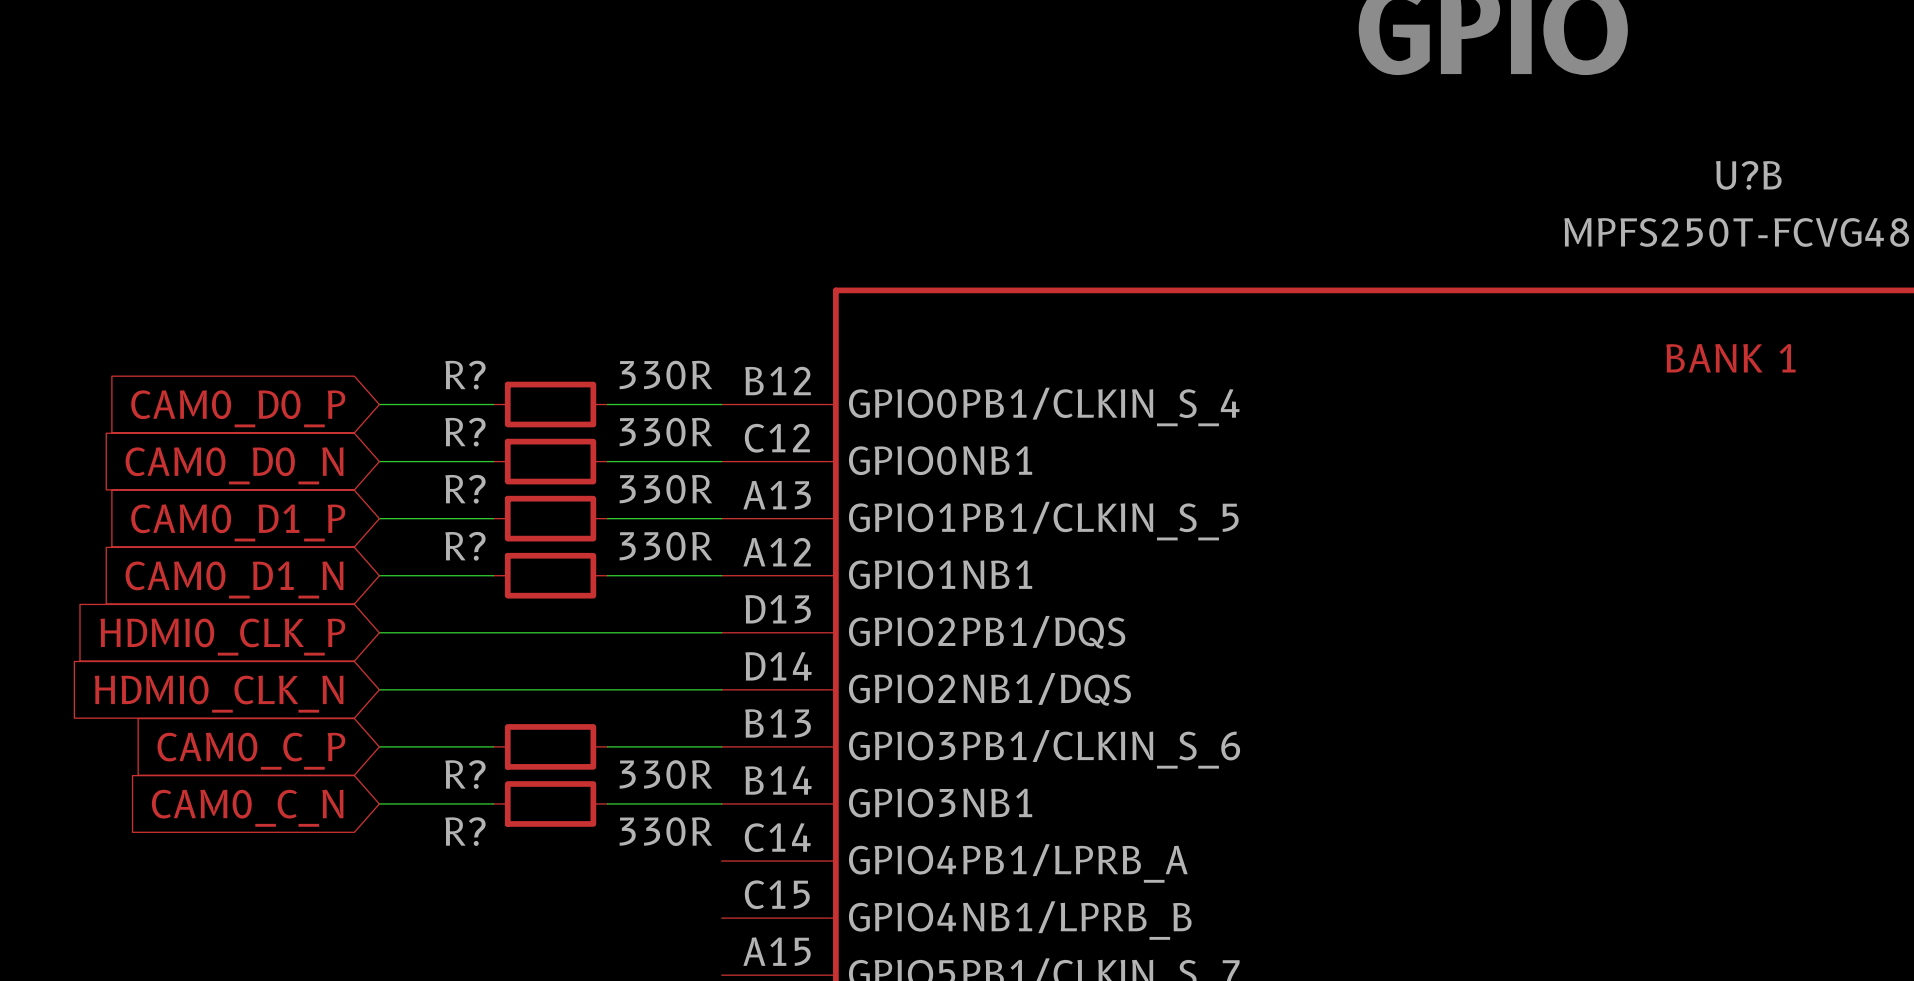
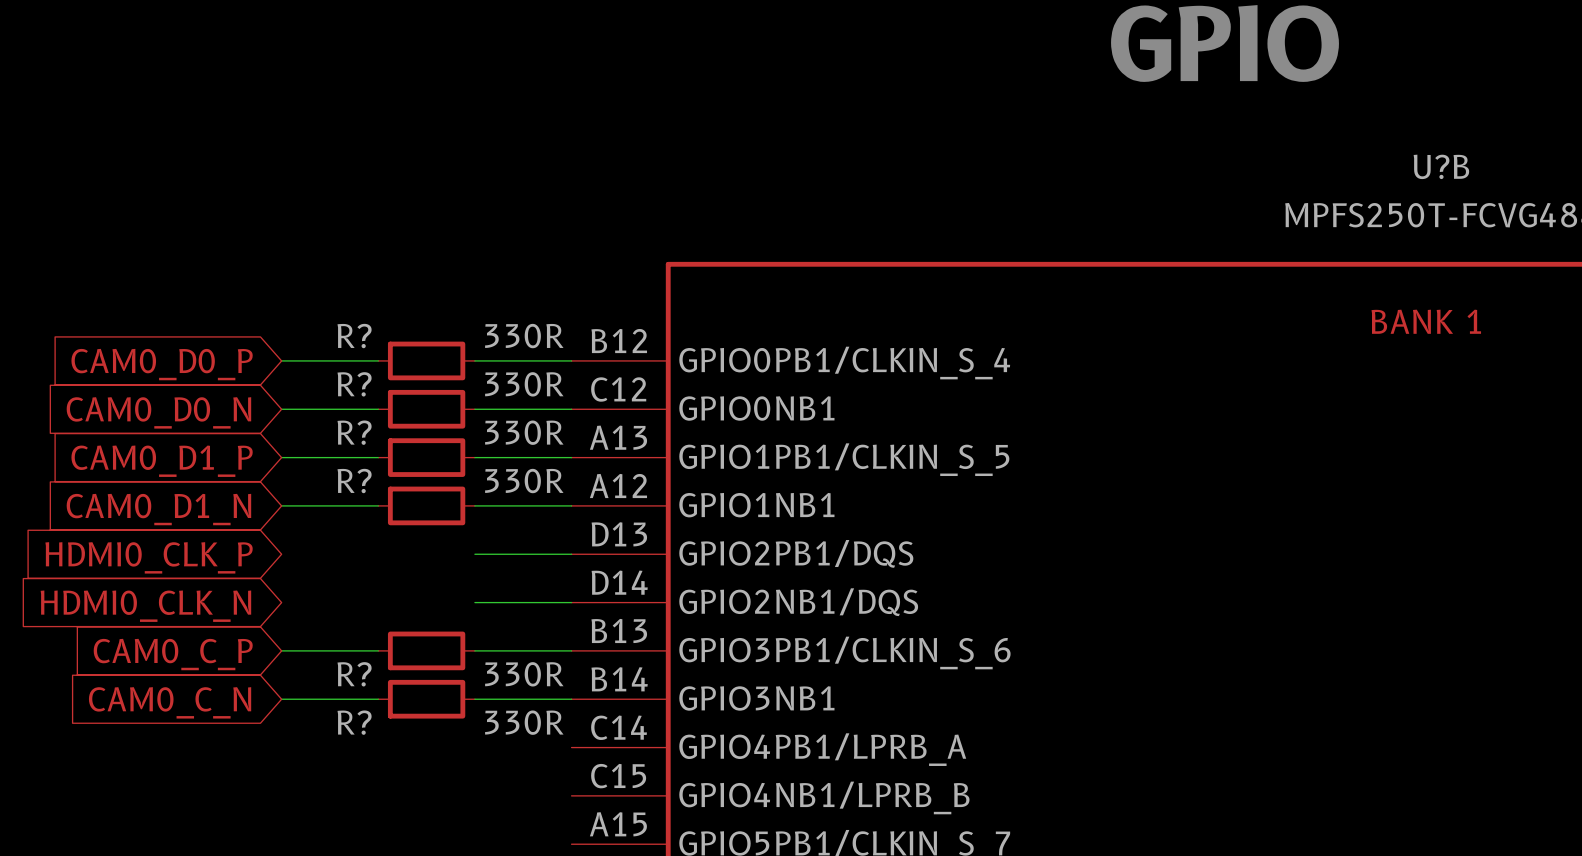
wire: (379, 632) (607, 632) -> none
wire: (379, 689) (607, 689) -> none

